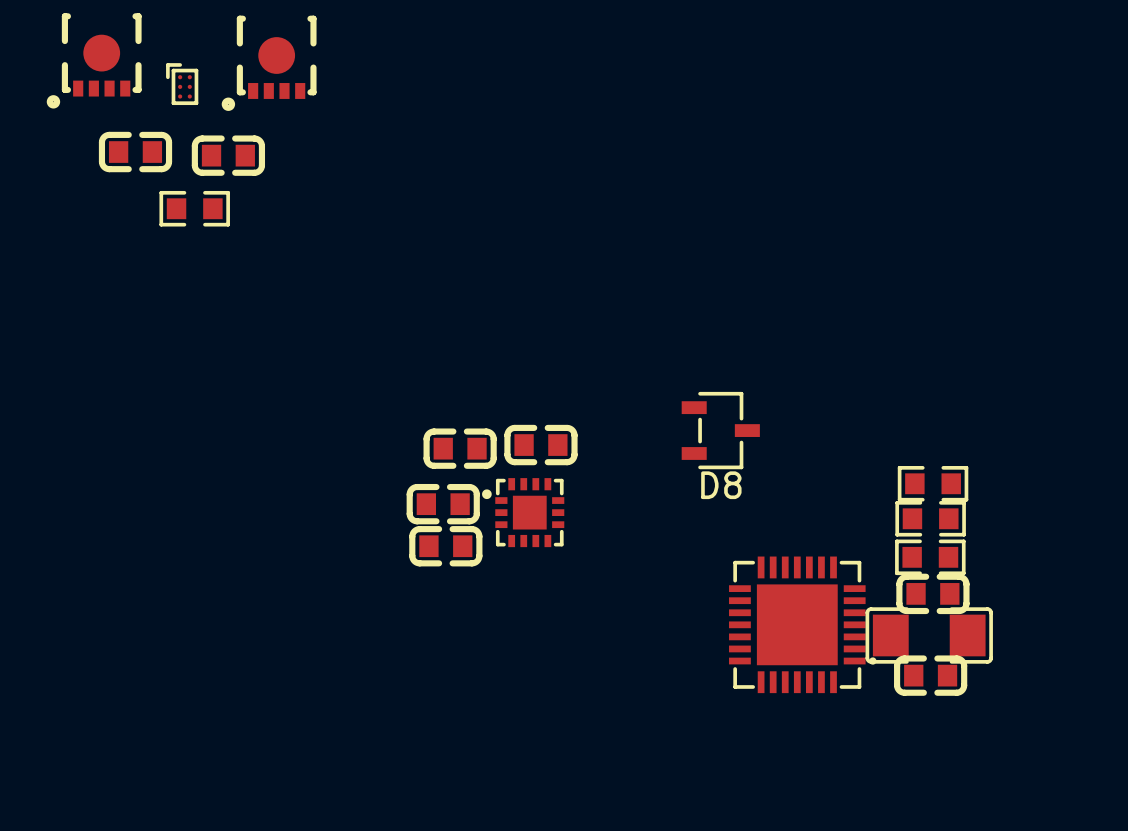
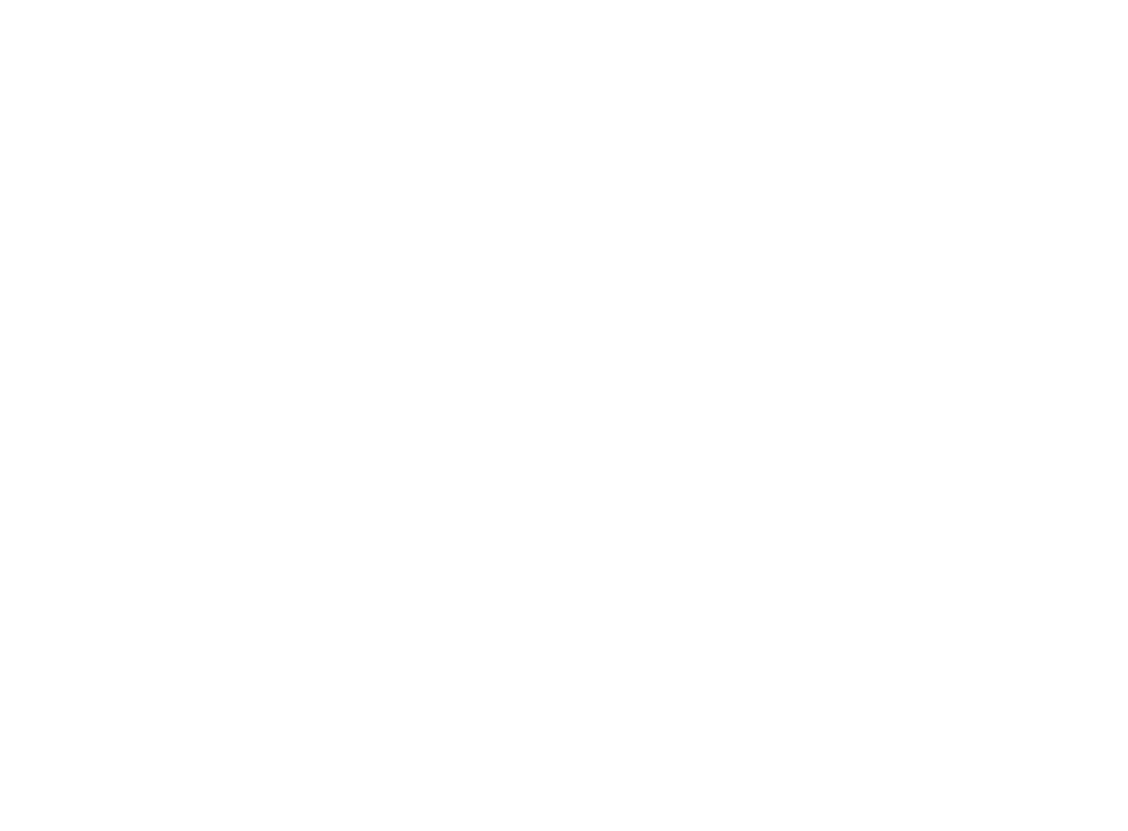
part: (94, 60) -> none
part: (269, 63) -> none
part: (182, 84) -> none
part: (135, 152) -> none
part: (228, 155) -> none
part: (194, 208) -> none
D8: (720, 430) -> none
part: (540, 445) -> none
part: (460, 448) -> none
part: (933, 483) -> none
part: (443, 504) -> none
part: (523, 512) -> none
part: (930, 518) -> none
part: (445, 546) -> none
part: (930, 557) -> none
part: (932, 593) -> none
part: (802, 624) -> none
part: (929, 635) -> none
part: (930, 675) -> none

